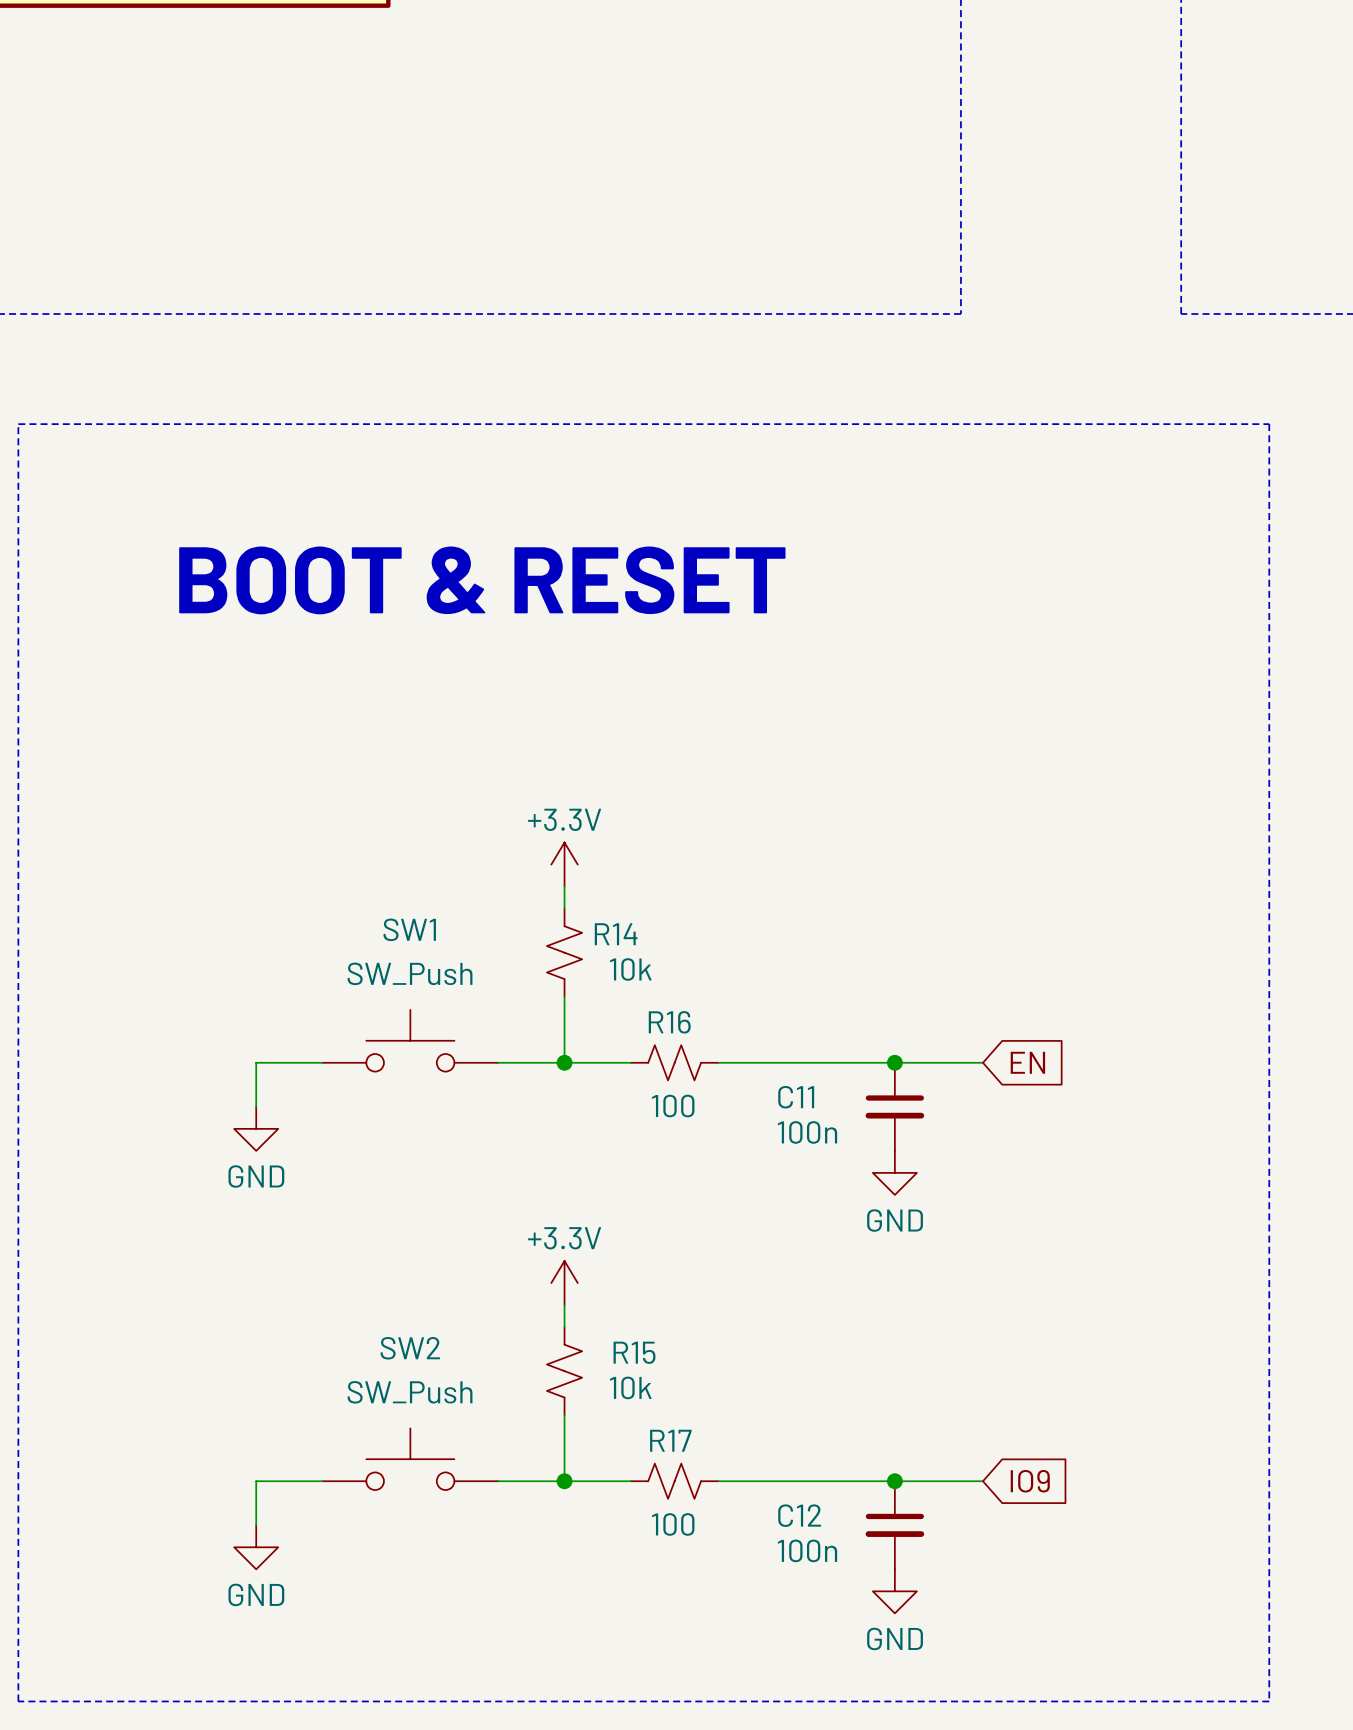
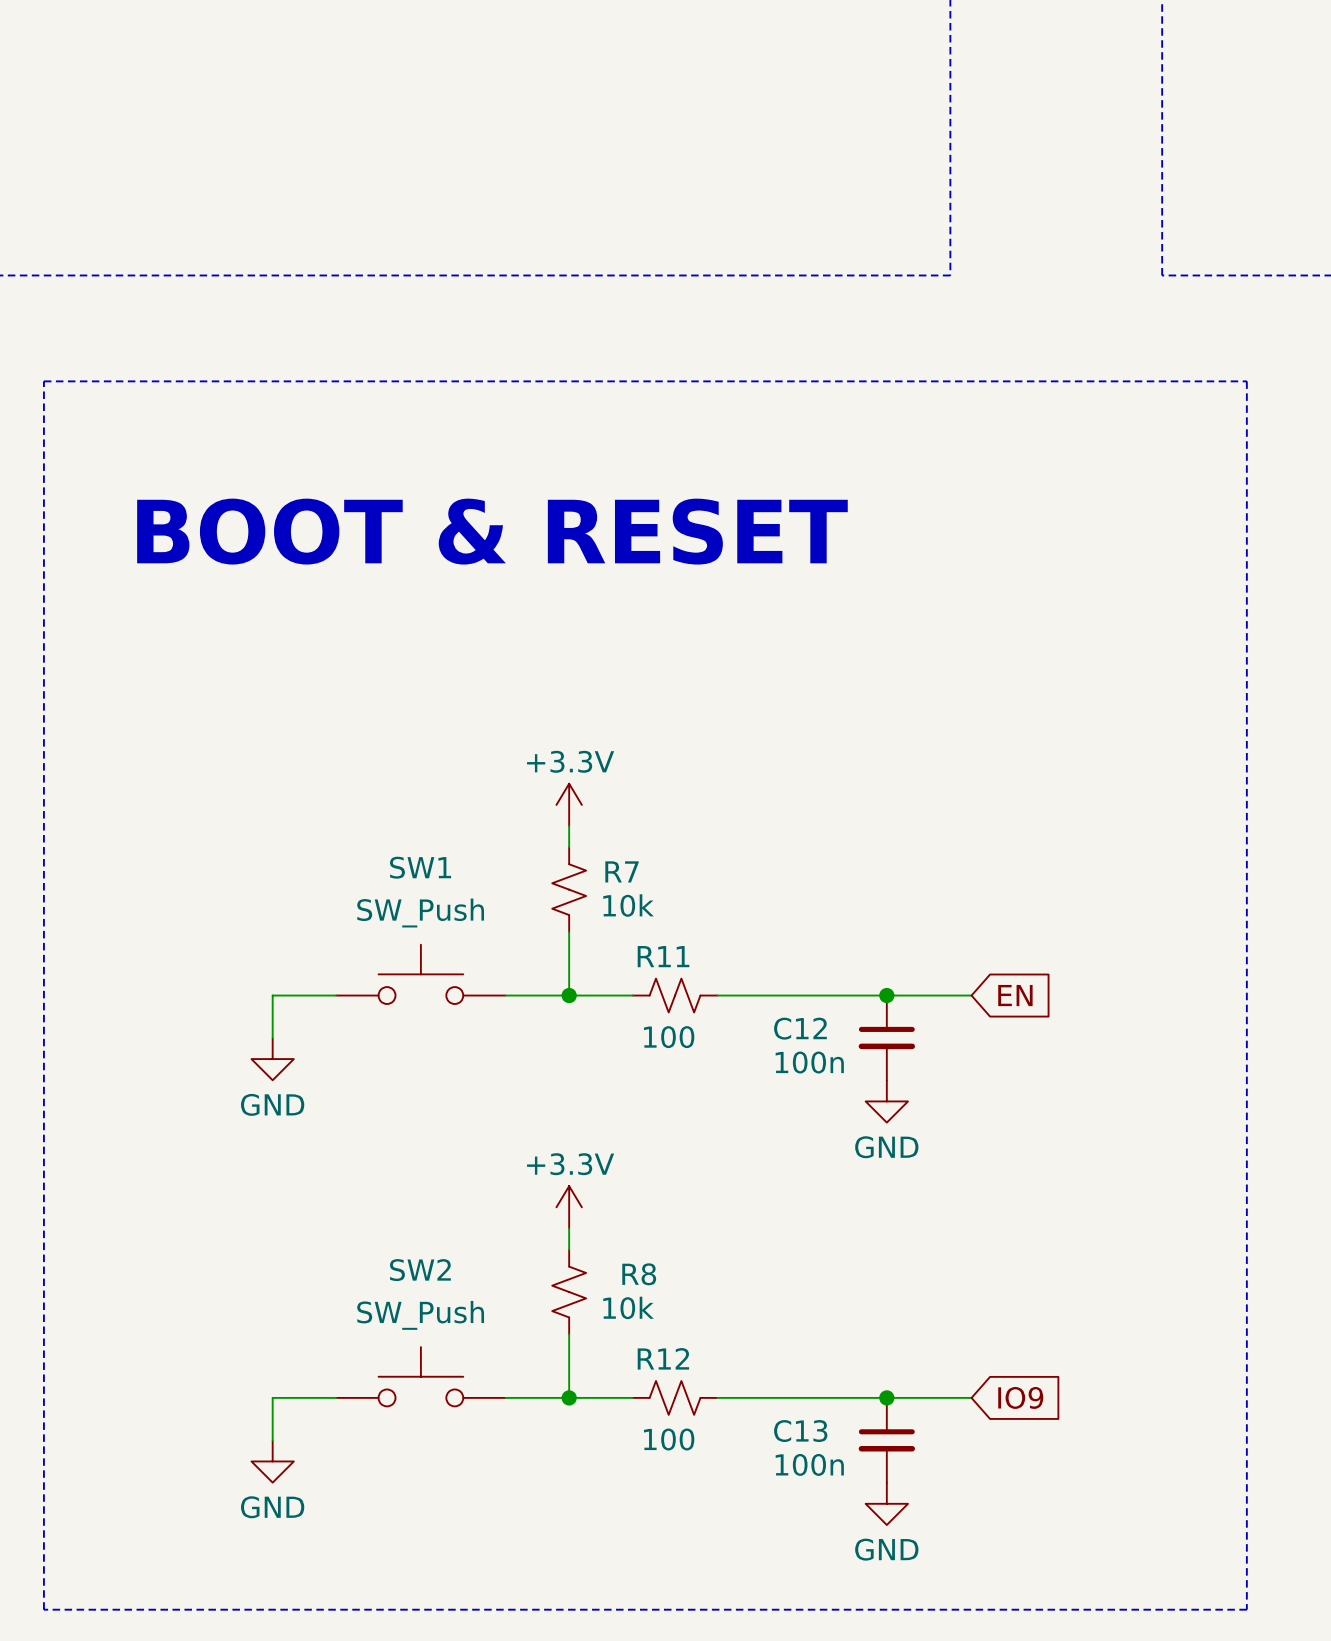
R14 name: R14 (616, 934) -> R7 (622, 871)
R16 name: R16 (669, 1022) -> R11 (663, 956)
C11 name: C11 (796, 1097) -> C12 (800, 1028)
R15 name: R15 (634, 1352) -> R8 (639, 1274)
R17 name: R17 (670, 1440) -> R12 (663, 1358)
C12 name: C12 (799, 1515) -> C13 (800, 1431)

